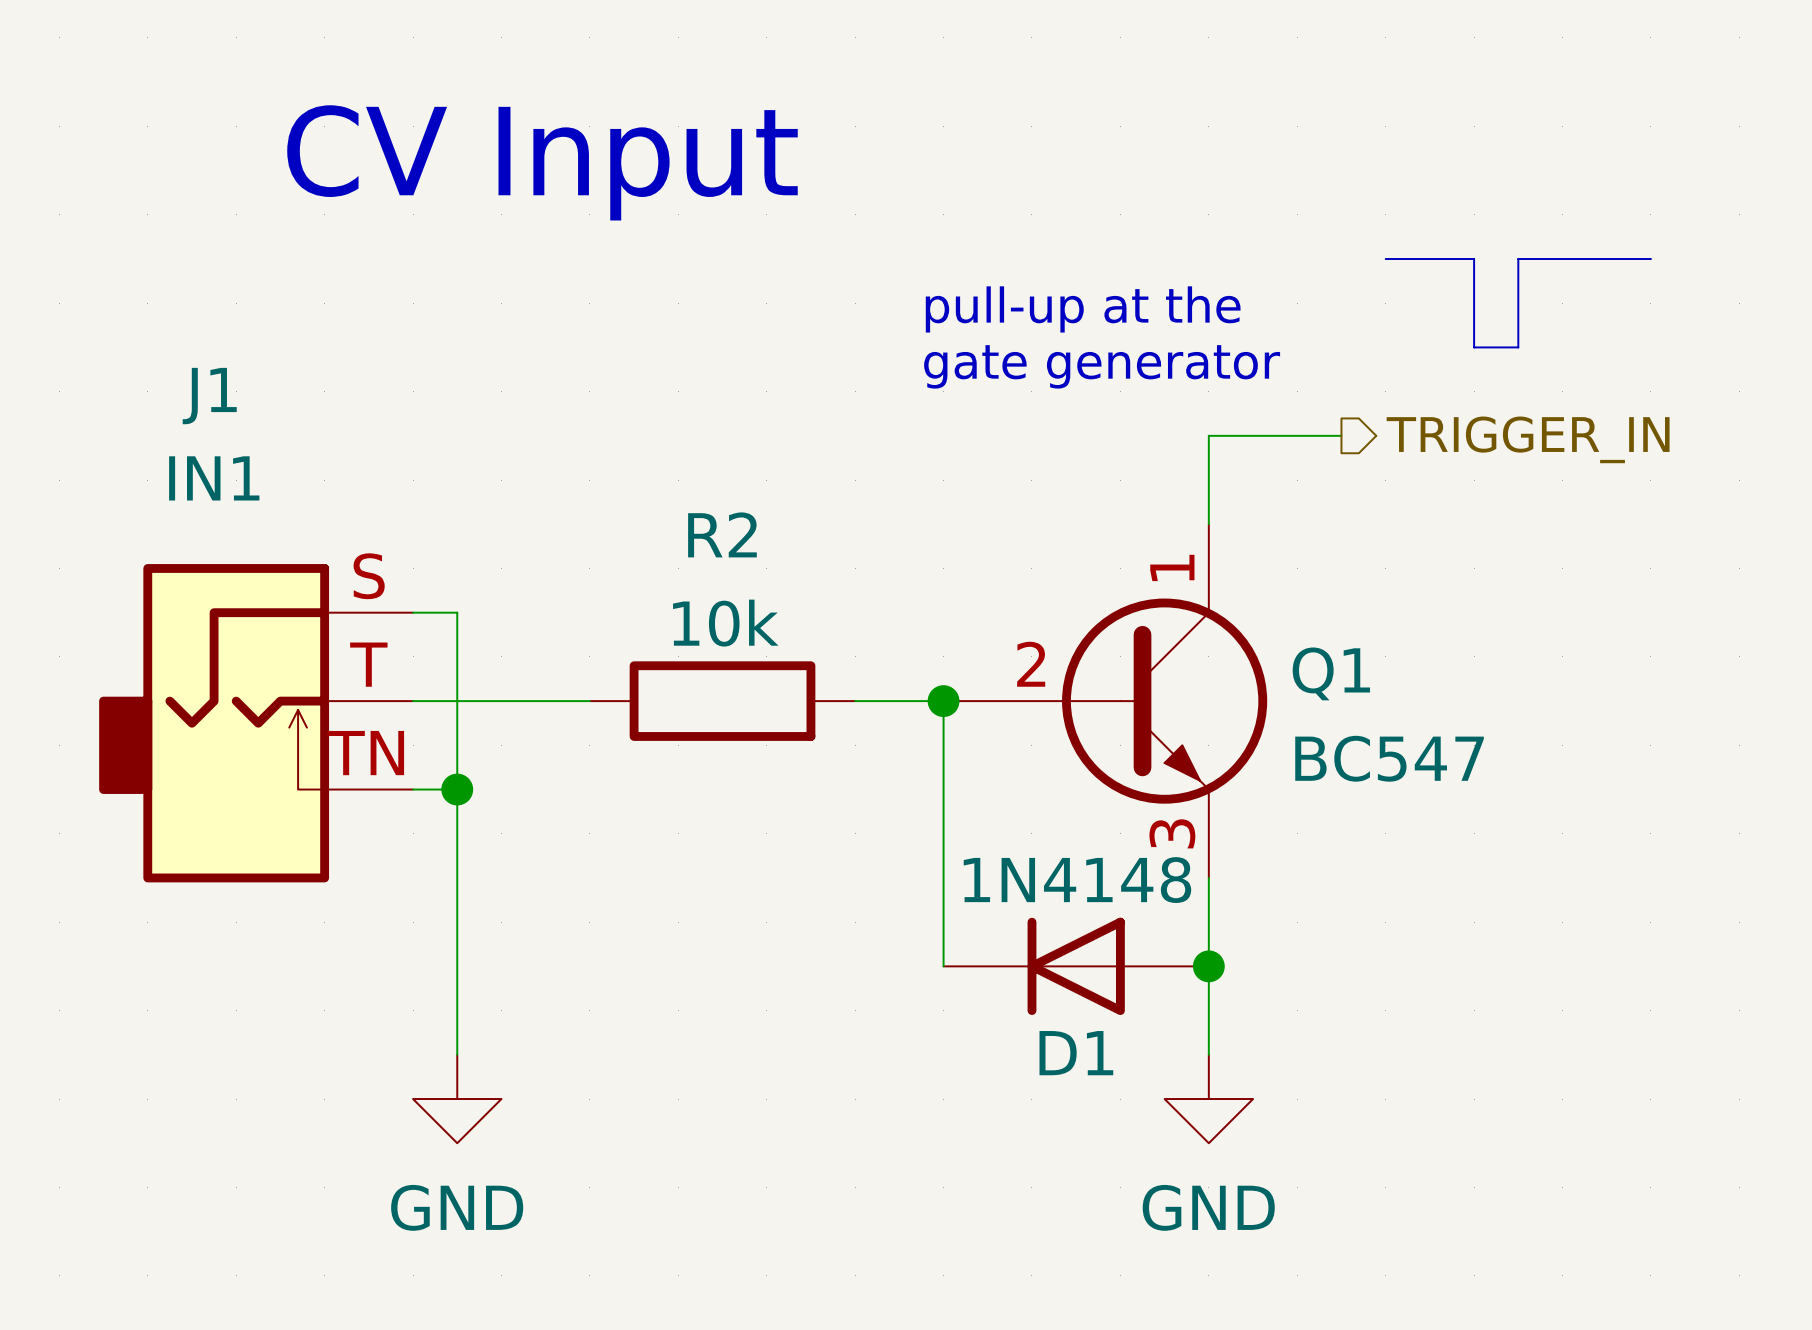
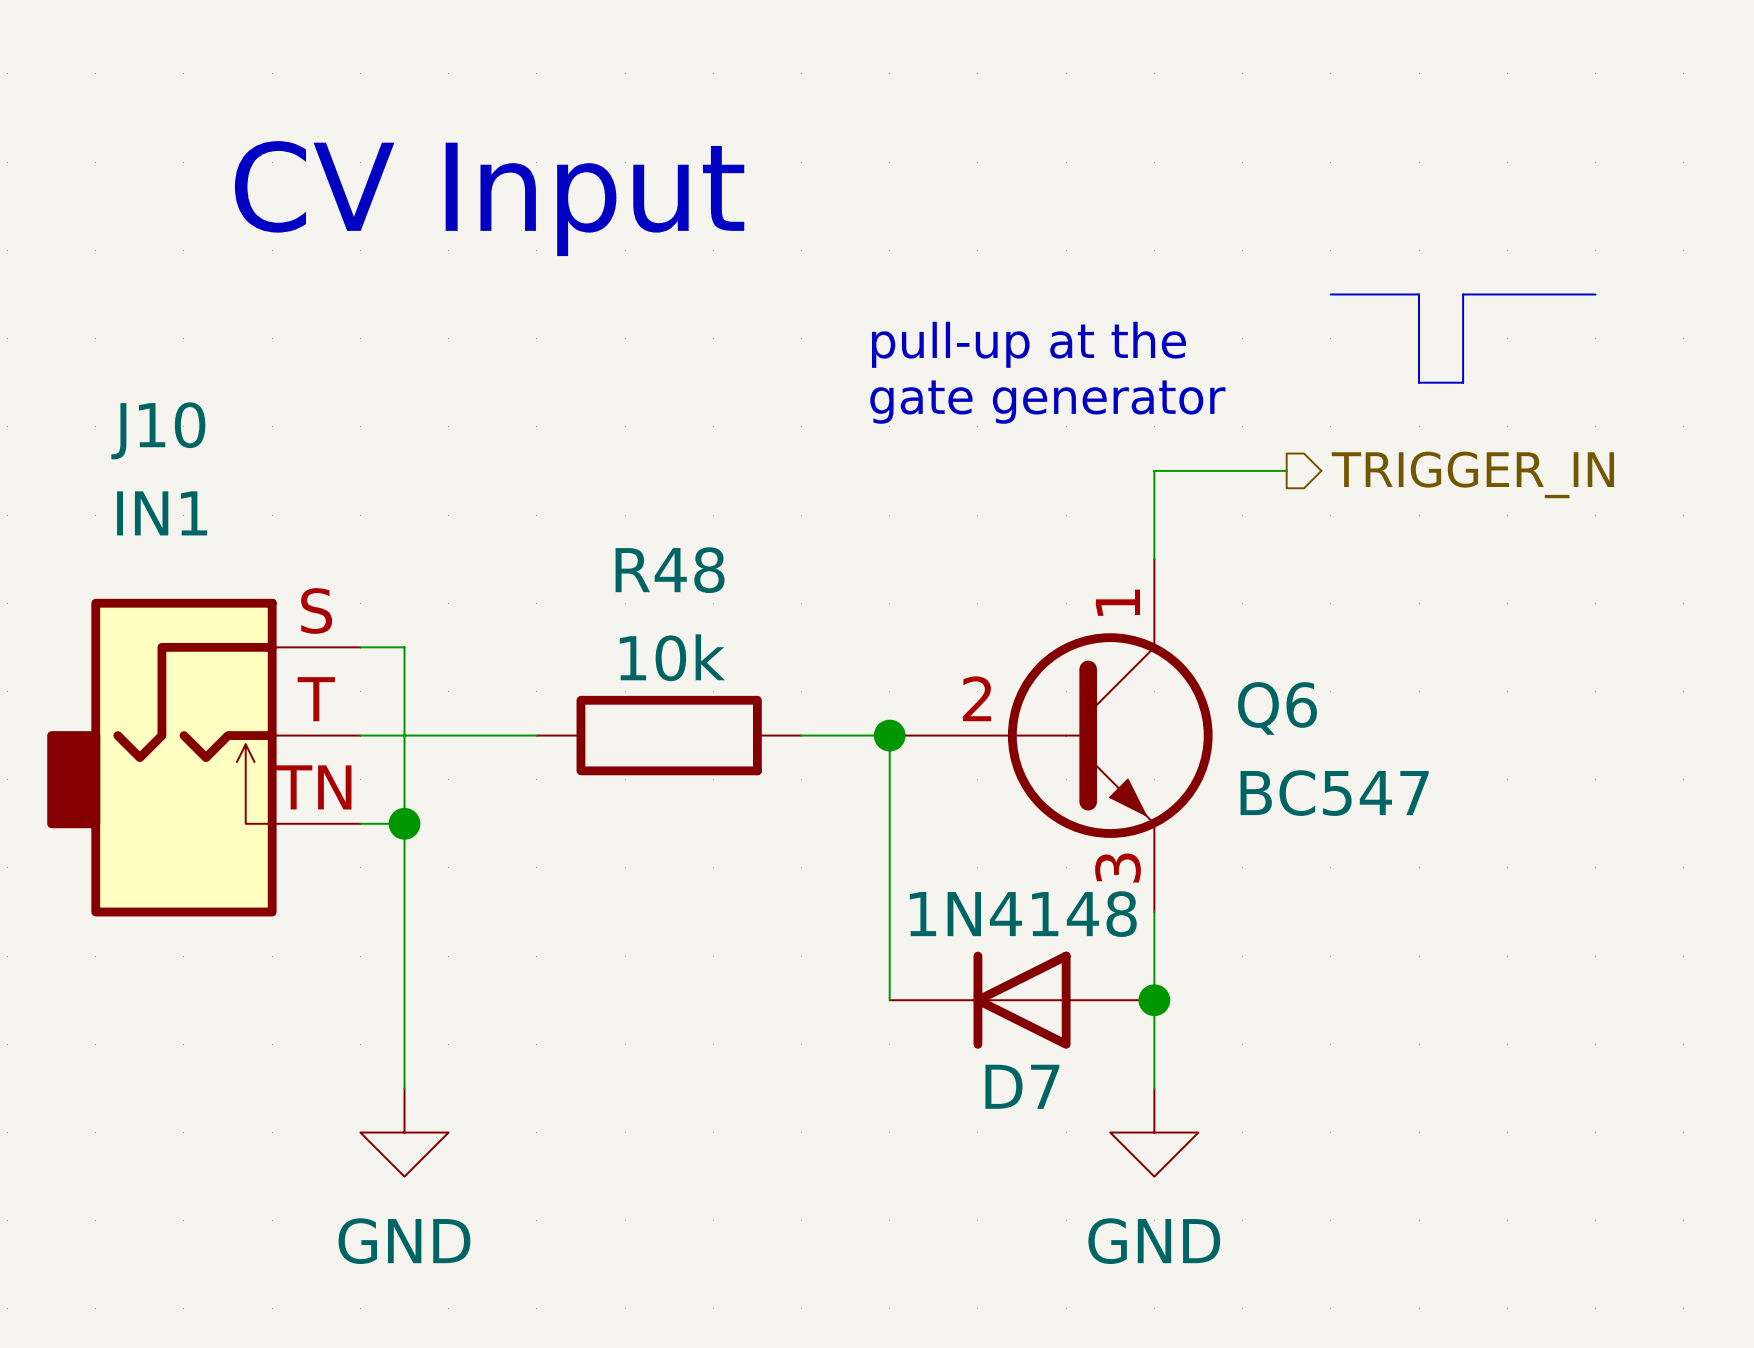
J1 name: J1 (209, 396) -> J10 (158, 430)
R2 name: R2 (722, 534) -> R48 (670, 570)
Q1 name: Q1 (1331, 673) -> Q6 (1277, 708)
D1 name: D1 (1076, 1053) -> D7 (1022, 1086)

